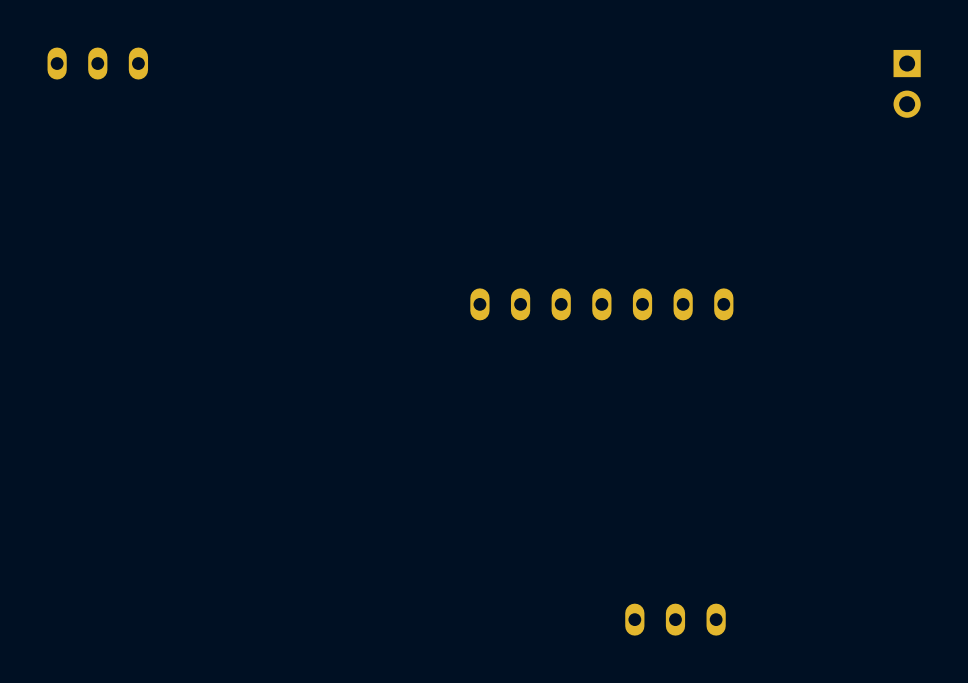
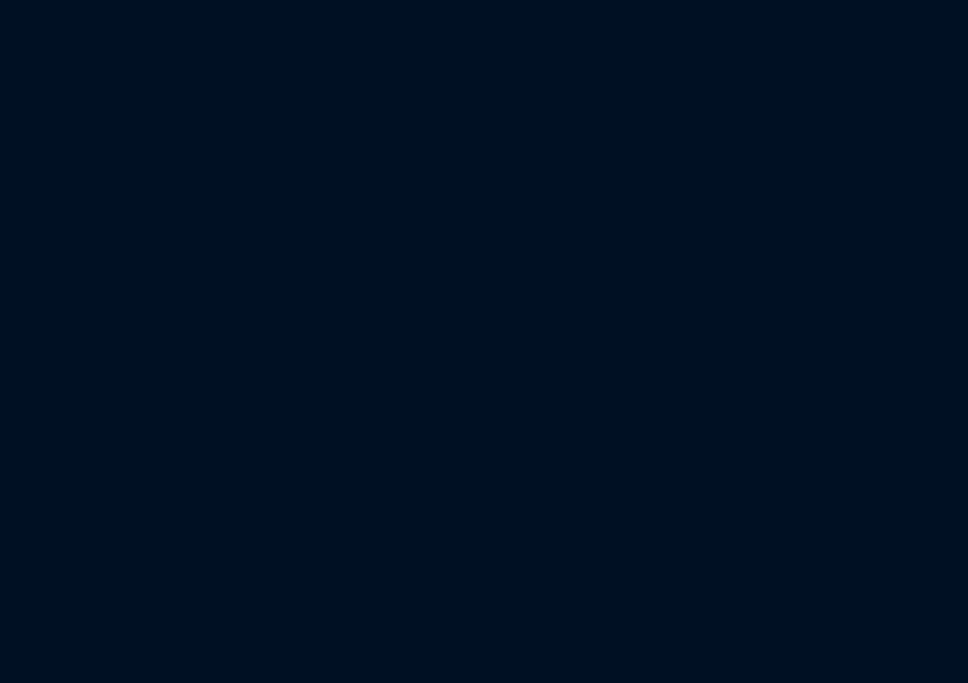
part: (97, 63) -> none
part: (907, 83) -> none
part: (601, 304) -> none
part: (675, 619) -> none

